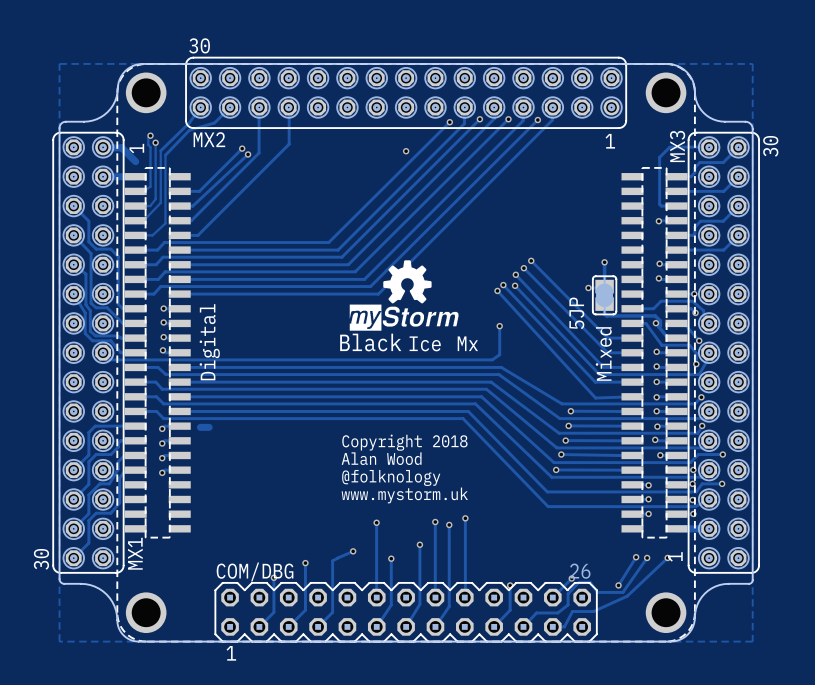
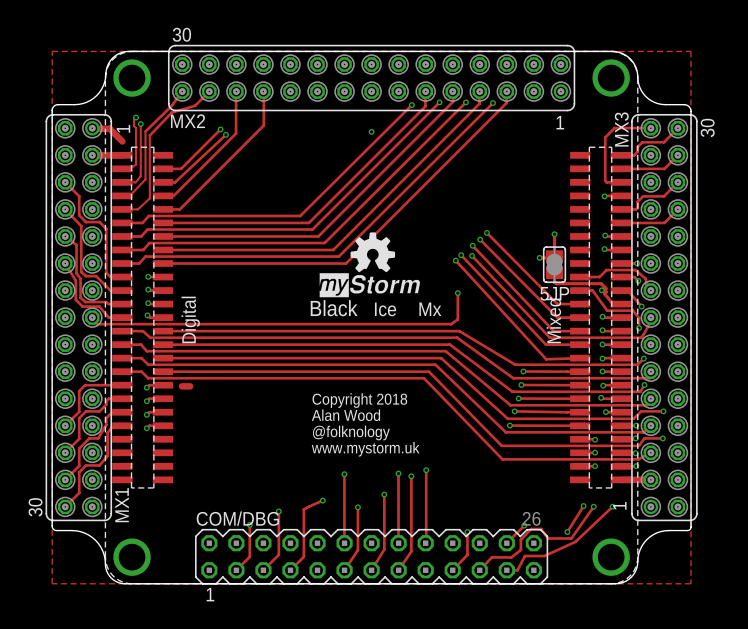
5JP name rotation: 0° (576, 313) -> 90° clockwise (554, 293)

